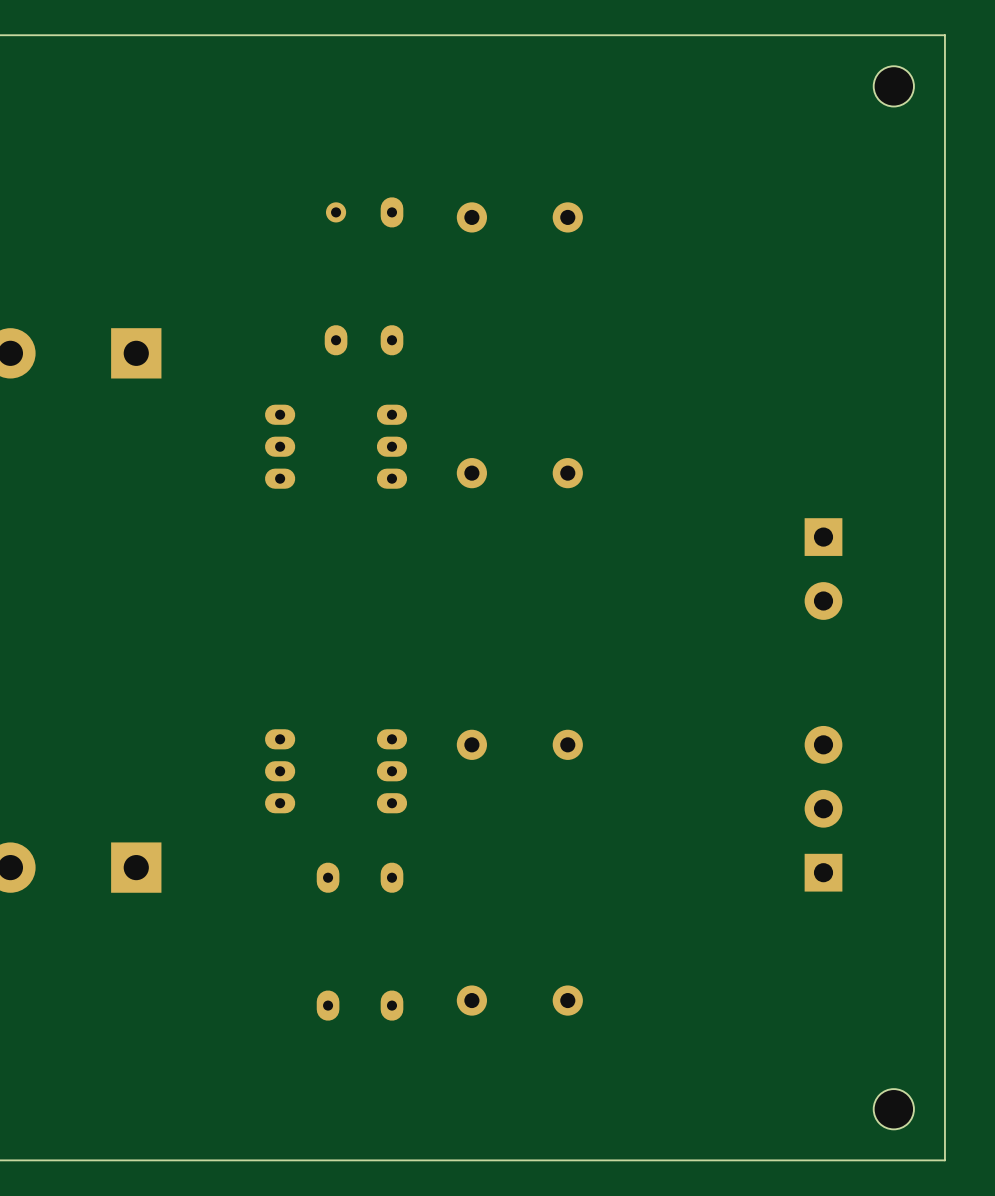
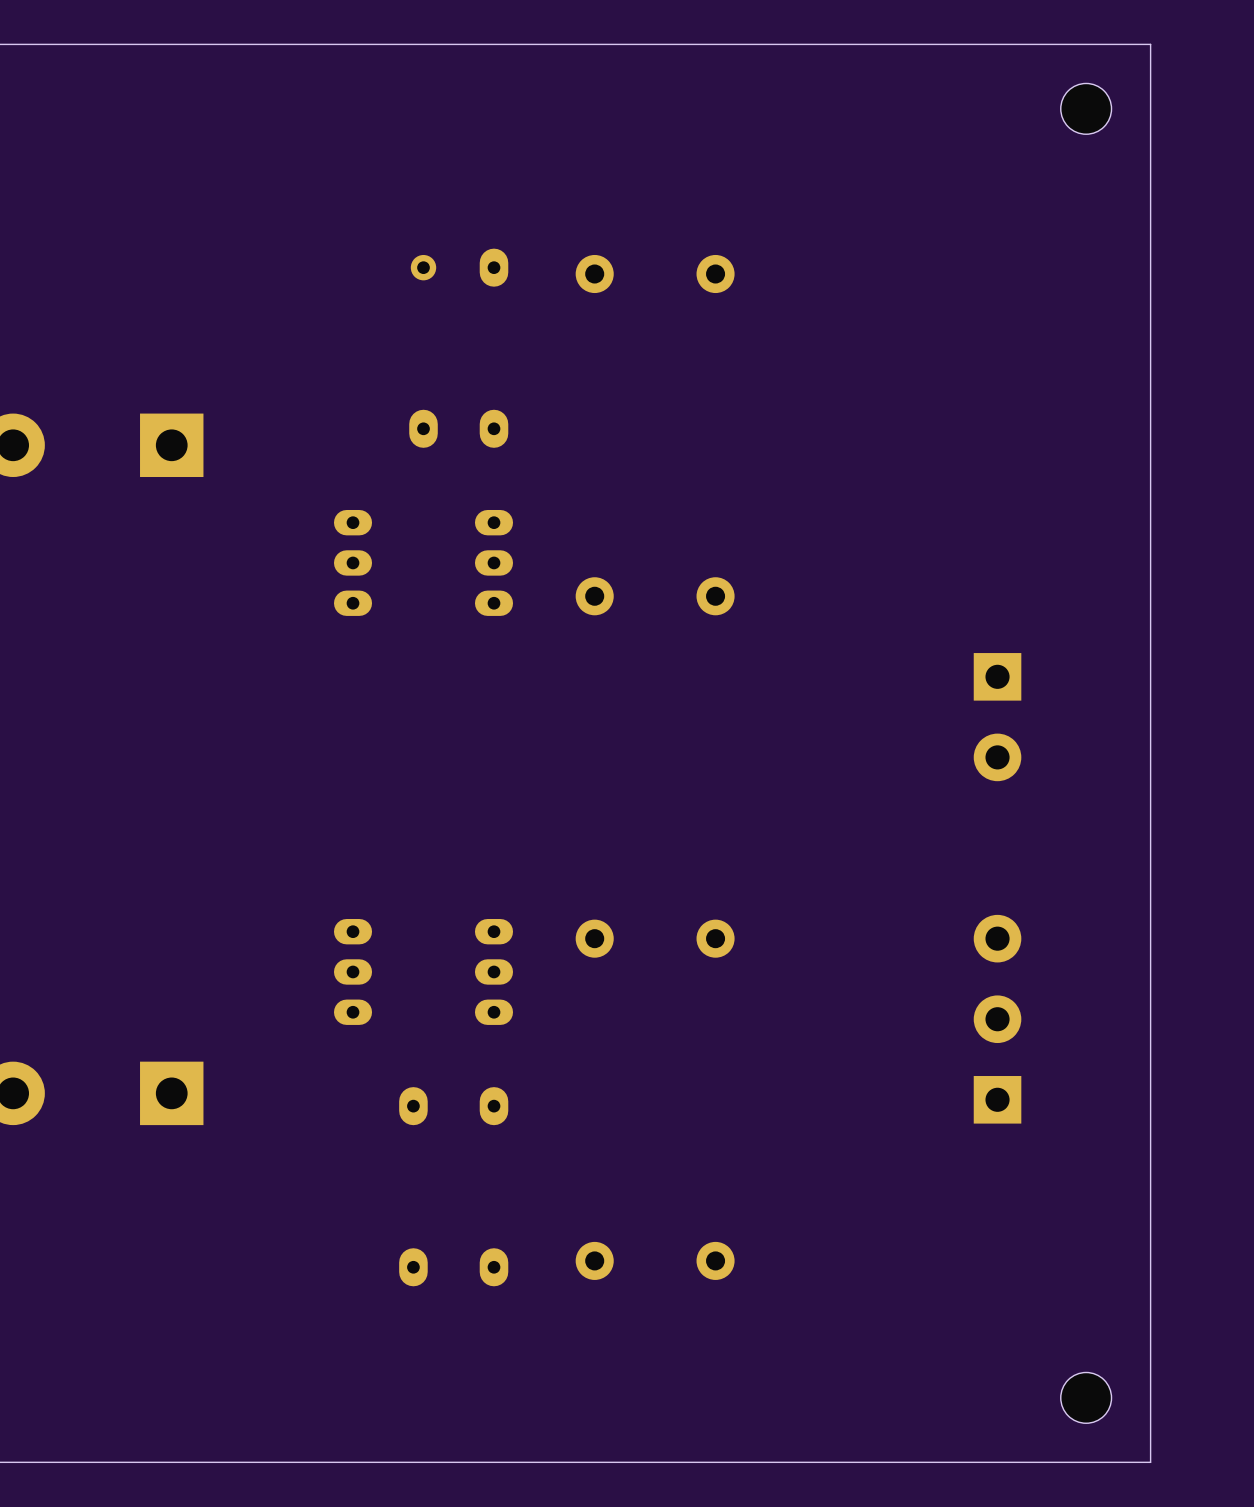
board edge: (913, 35) (944, 35) (944, 1160) (913, 1160) -> (1150, 44) (1150, 1462)
part position: (893, 86) -> (1086, 108)
part position: (823, 569) -> (997, 717)
part position: (823, 808) -> (997, 1019)
part position: (893, 1109) -> (1086, 1397)

